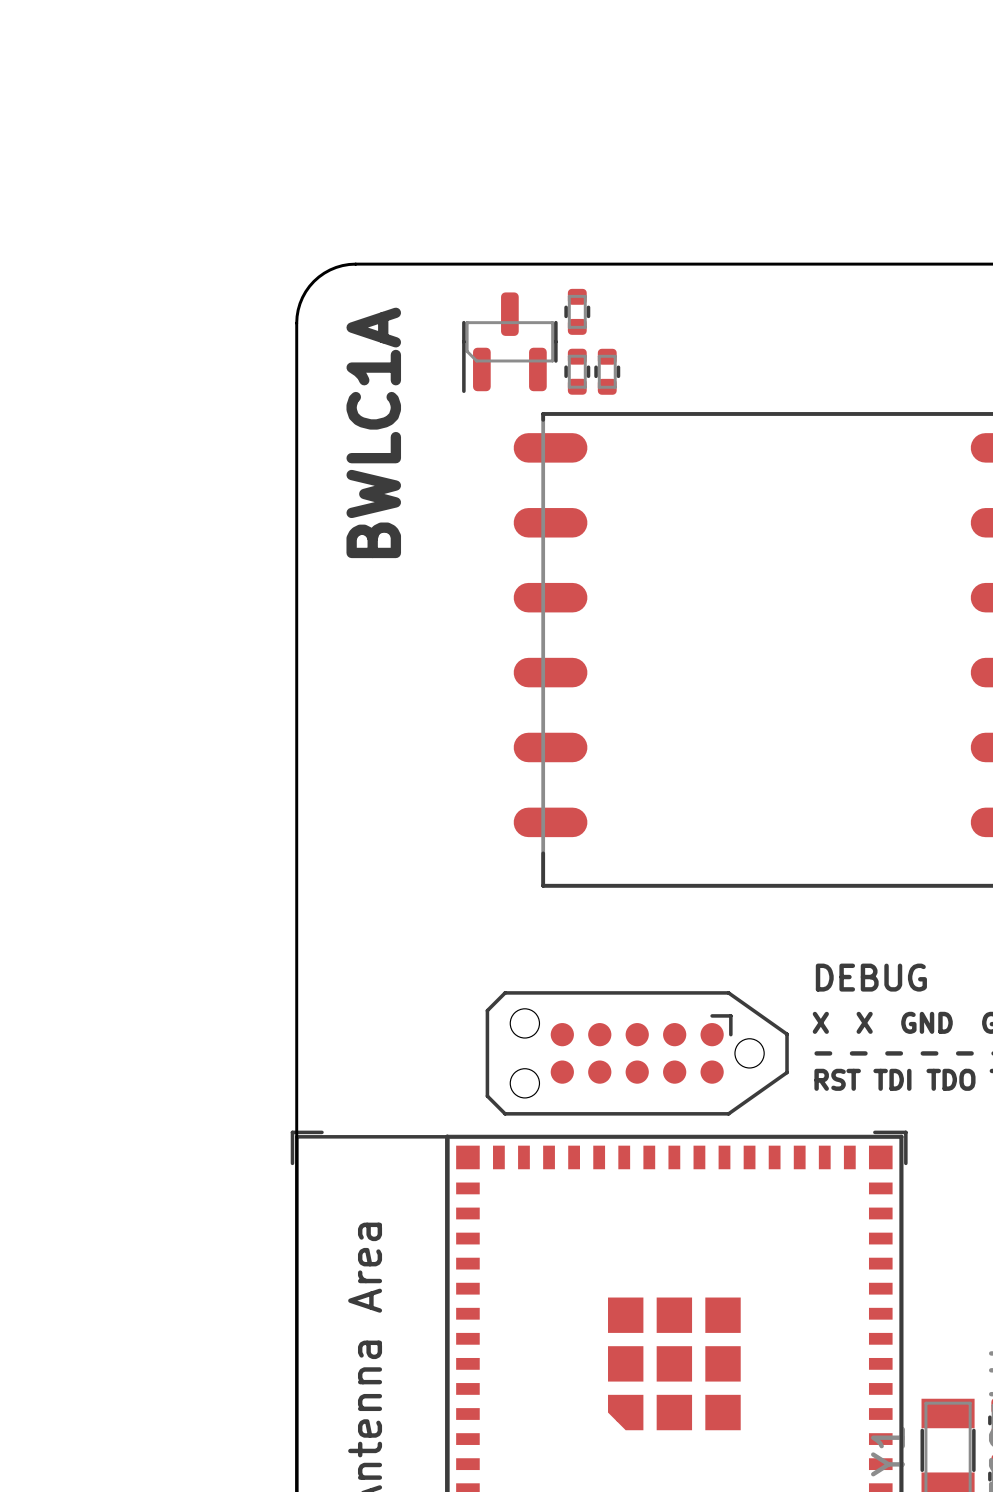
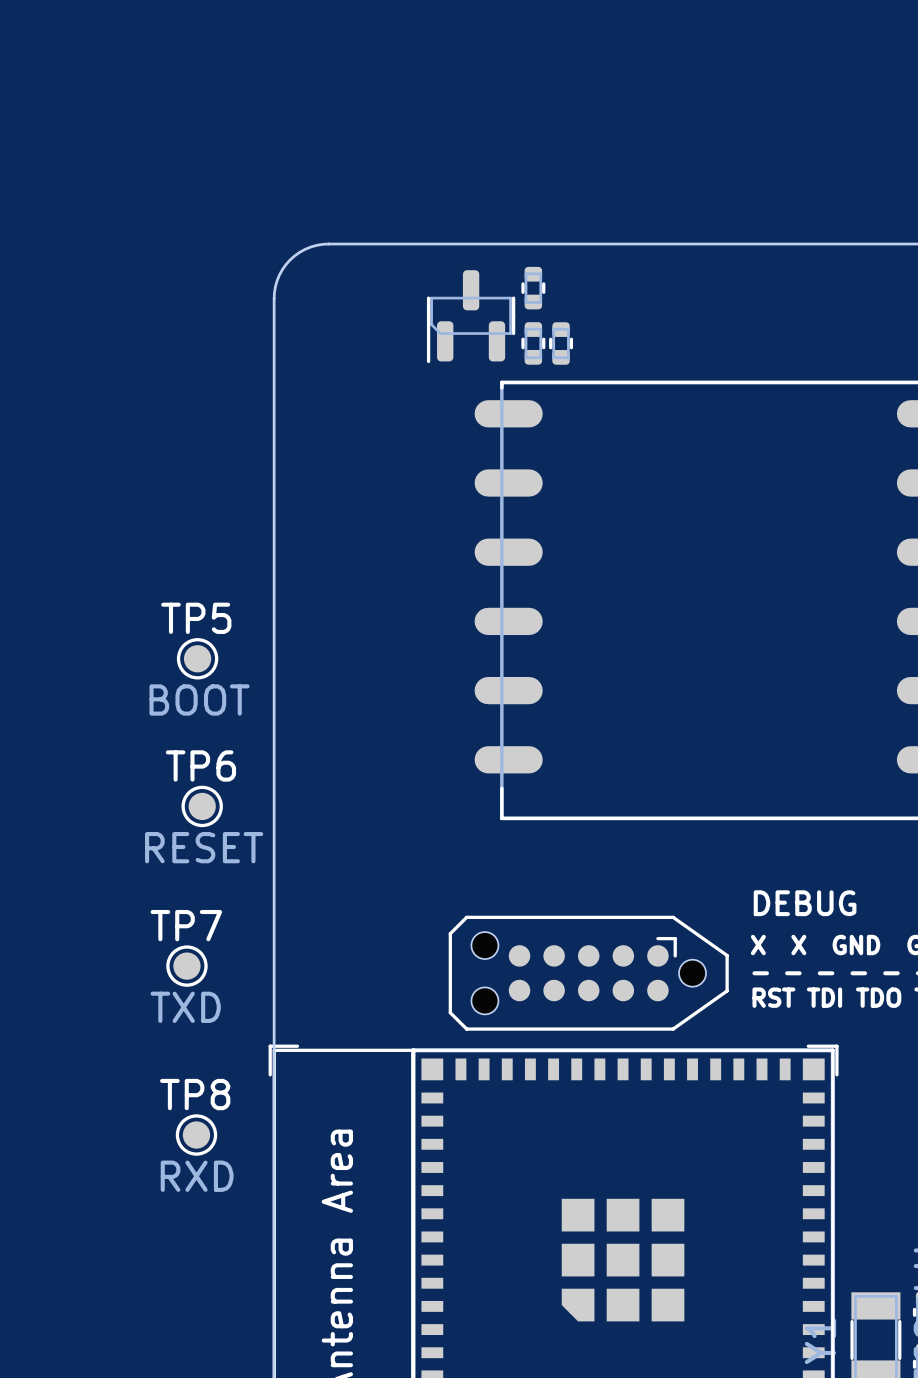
text: BWLC1A (373, 432) -> none
TP5: none -> BOOT (197, 658)
TP6: none -> RESET (202, 806)
TP7: none -> TXD (186, 966)
TP8: none -> RXD (196, 1135)

